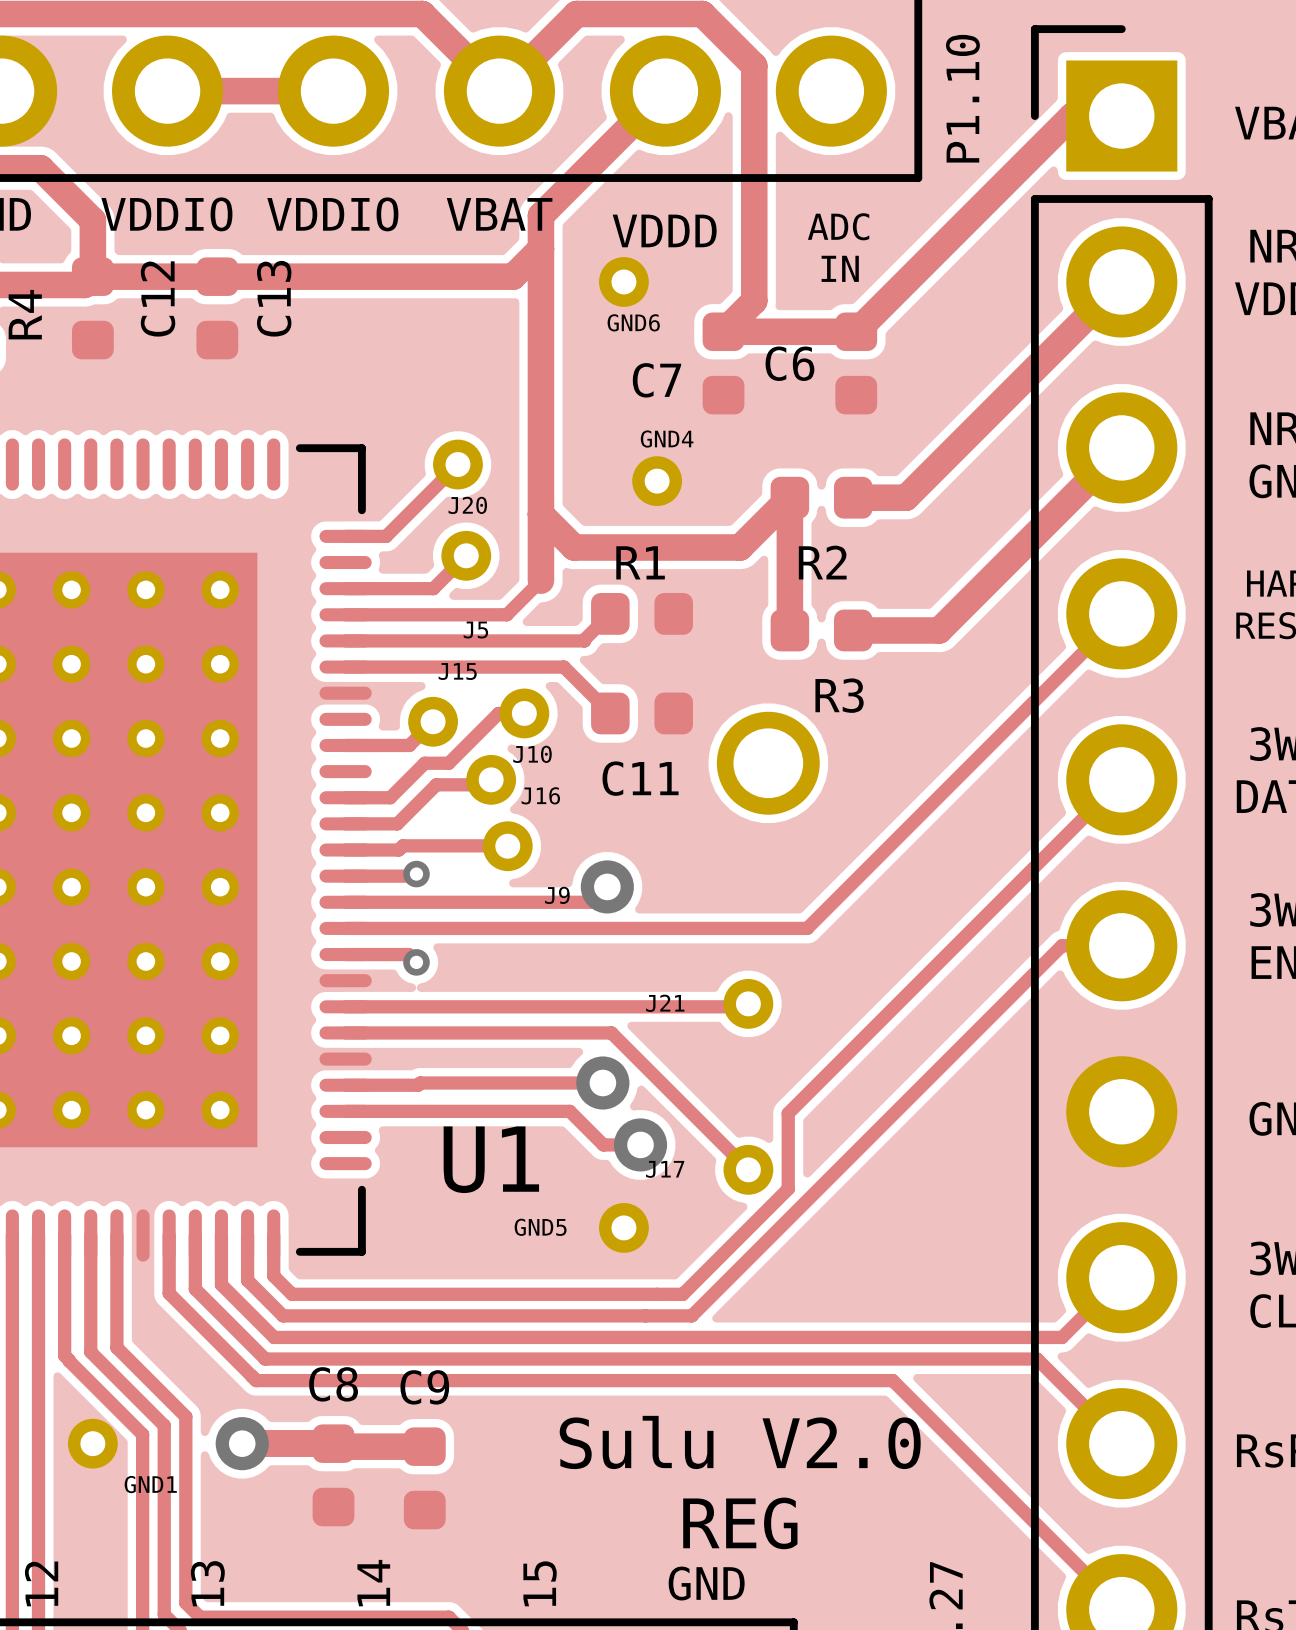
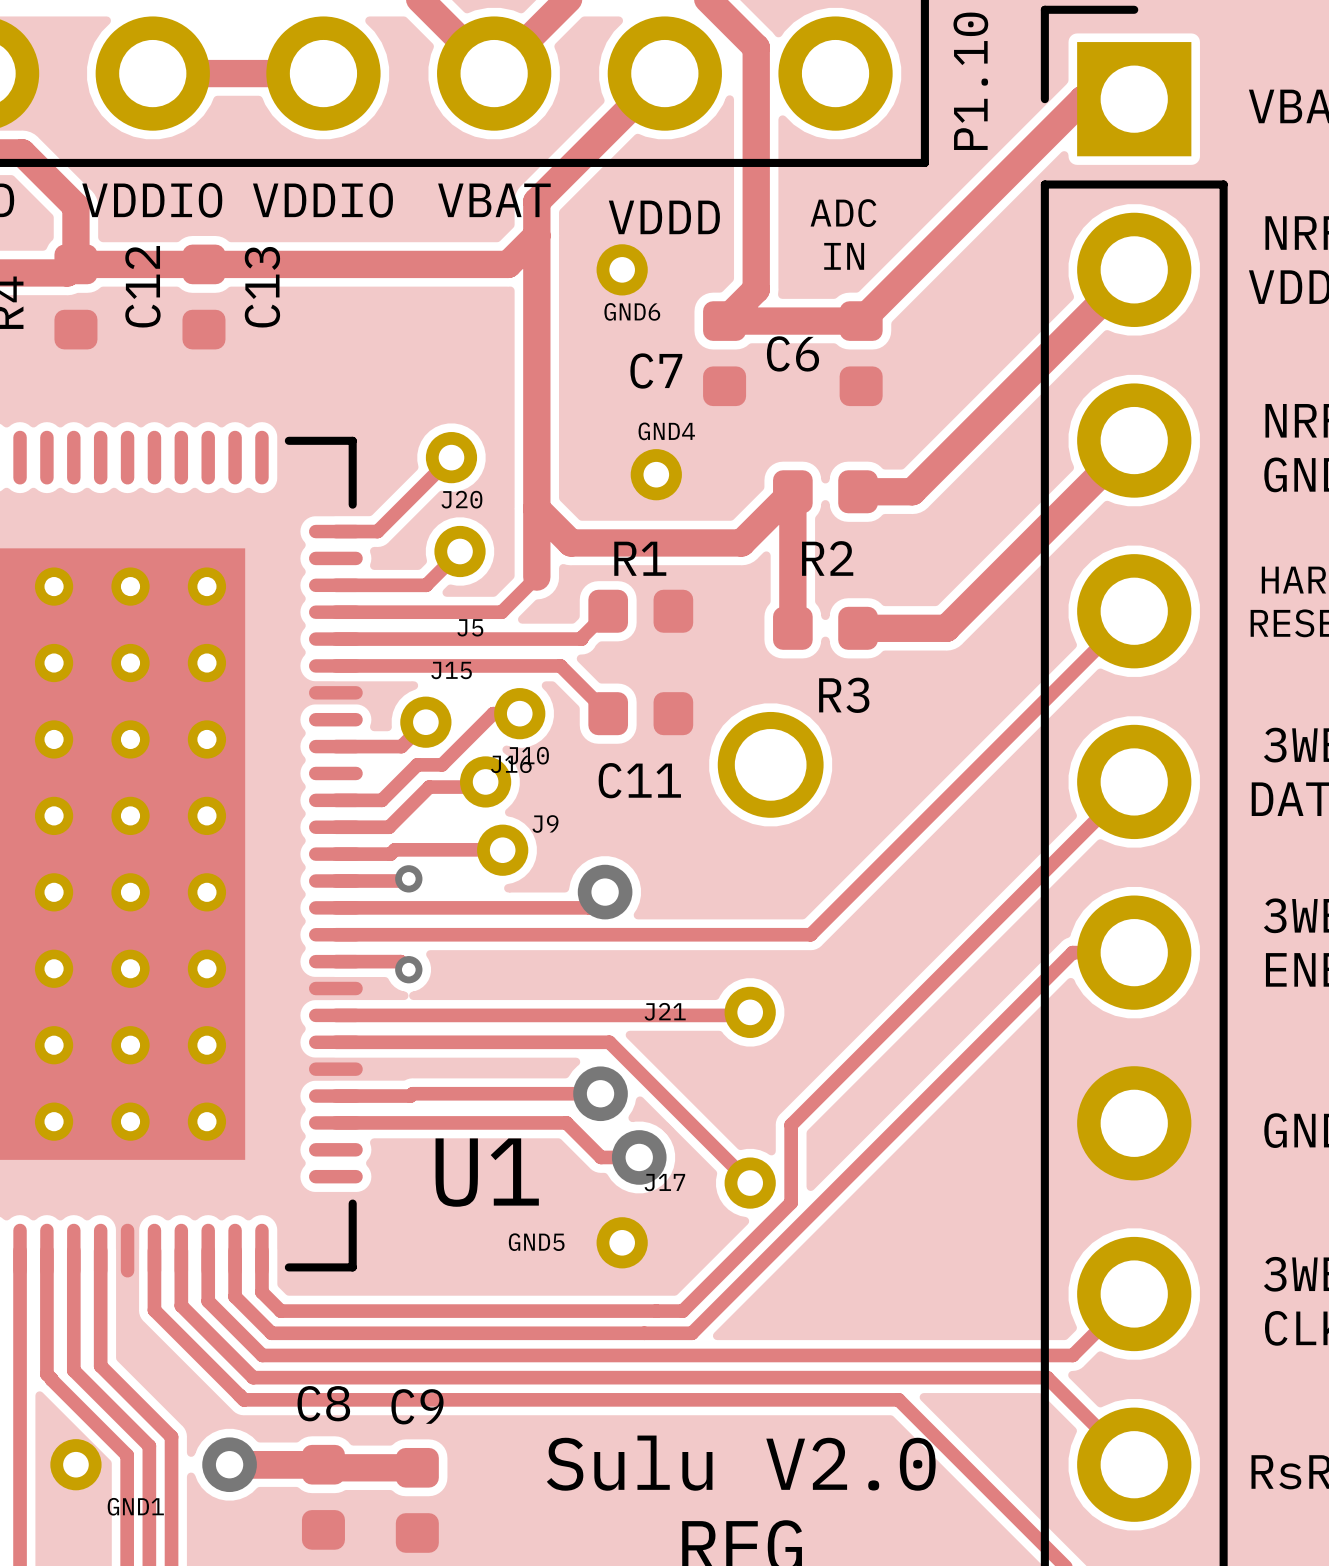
J16 name position: J16 (540, 795) -> J16 (511, 764)
J9 name position: J9 (557, 895) -> J9 (545, 823)

